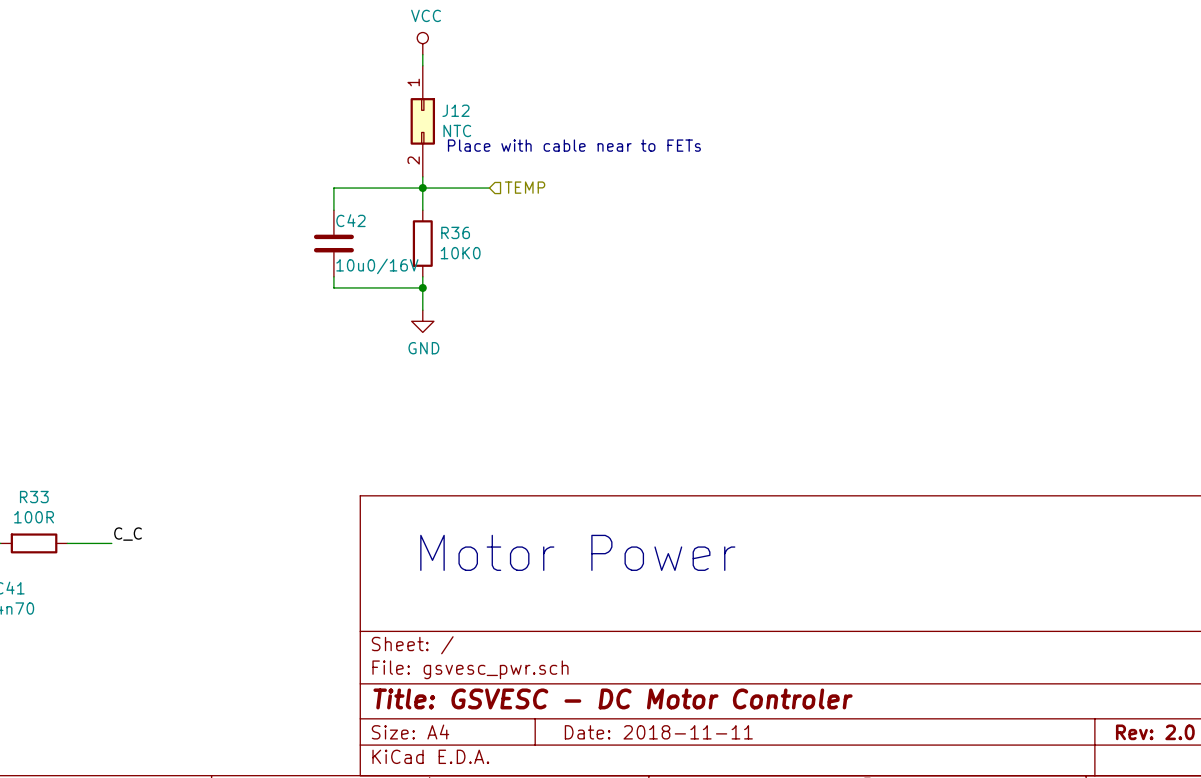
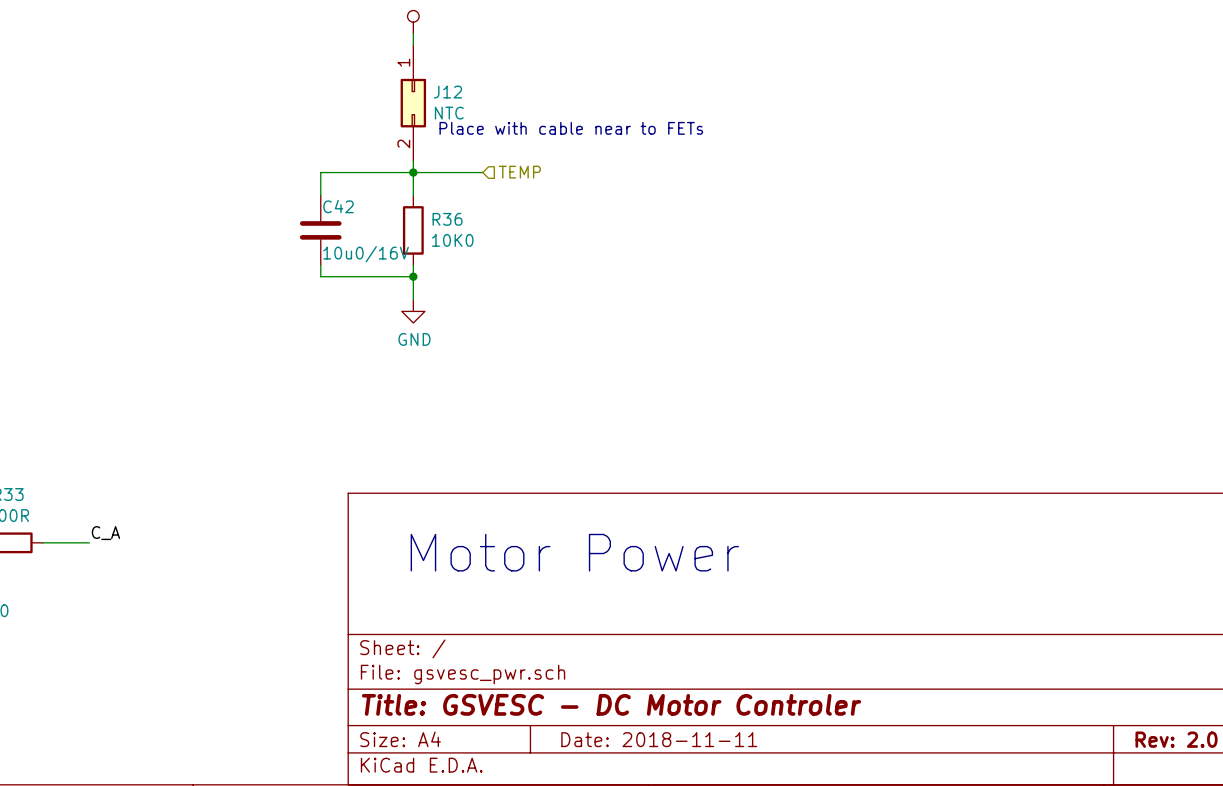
label: C_C (128, 534) -> C_A (105, 533)

